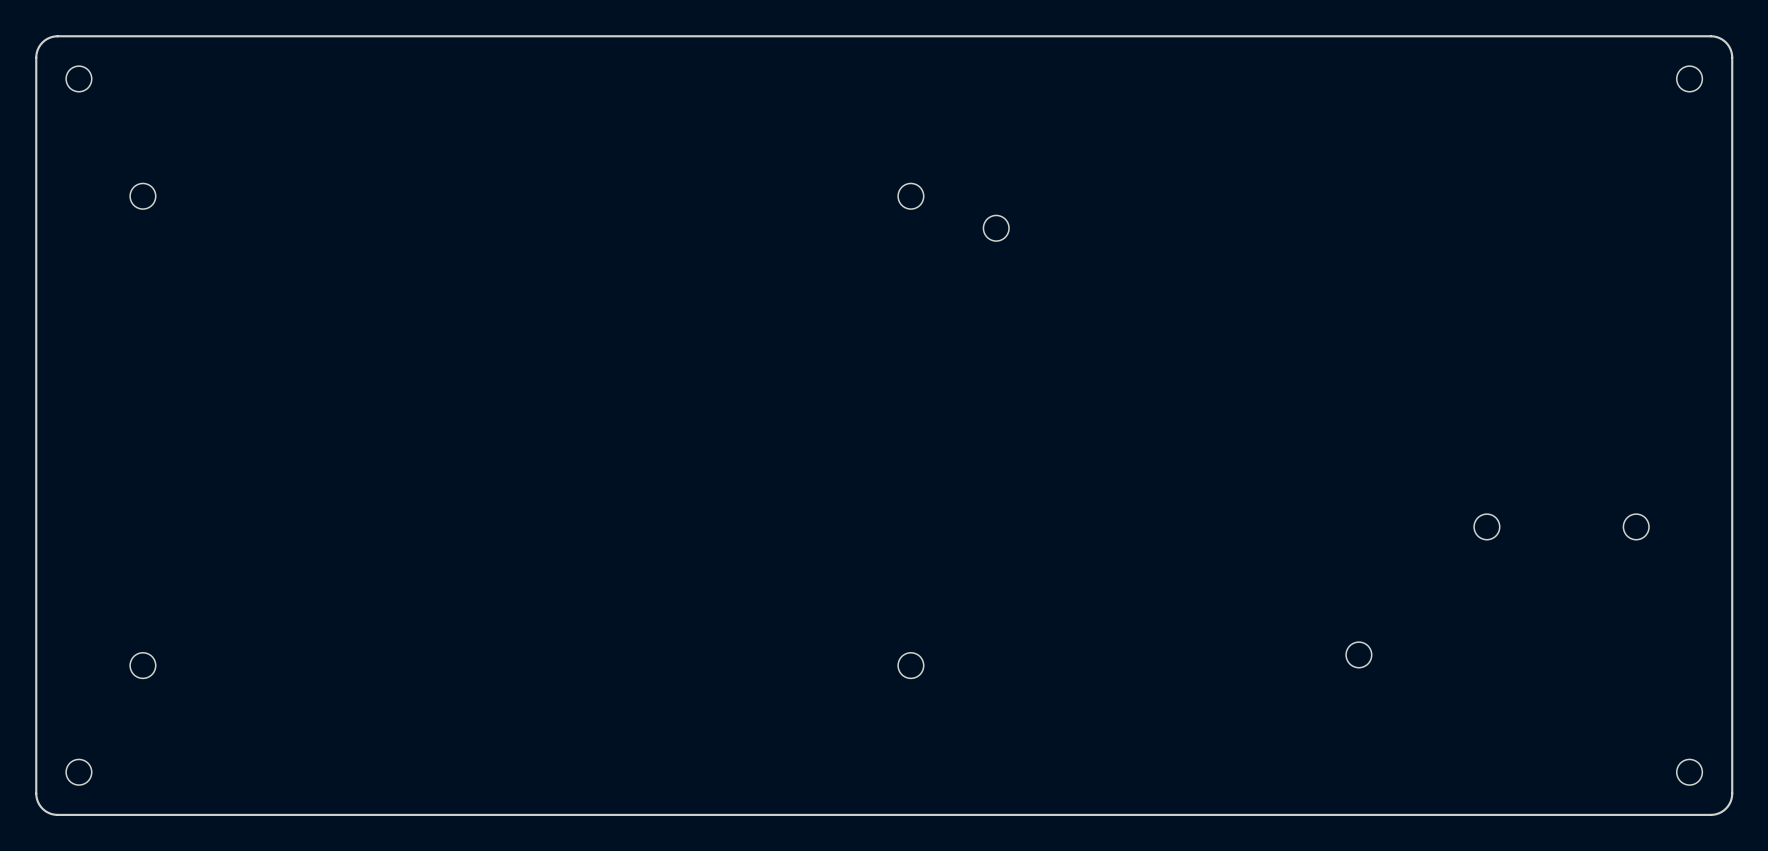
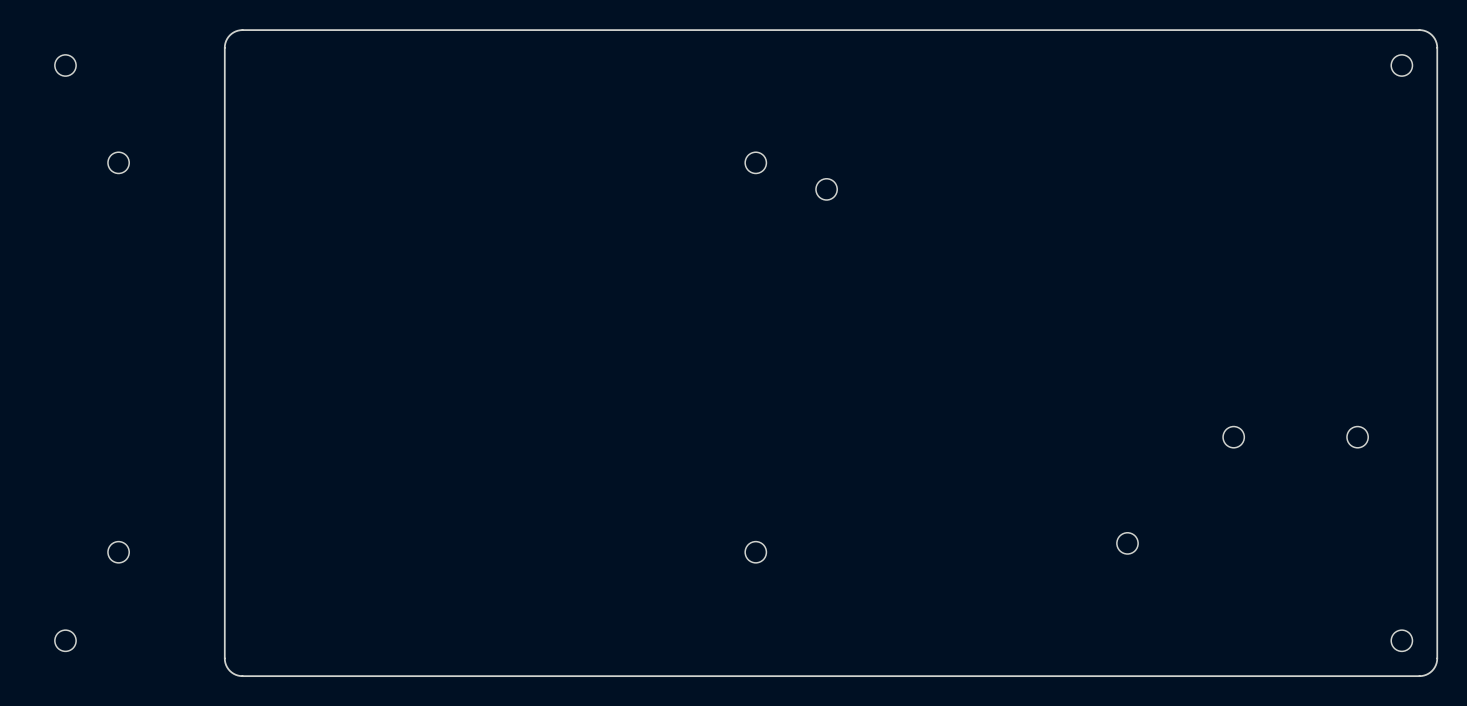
board edge: (292, 36) (54, 36) (42, 42) (37, 49) (36, 57) (36, 799) (44, 810) (57, 814) (292, 814) -> (242, 30) (229, 35) (224, 47) (224, 658) (229, 670) (242, 676)

